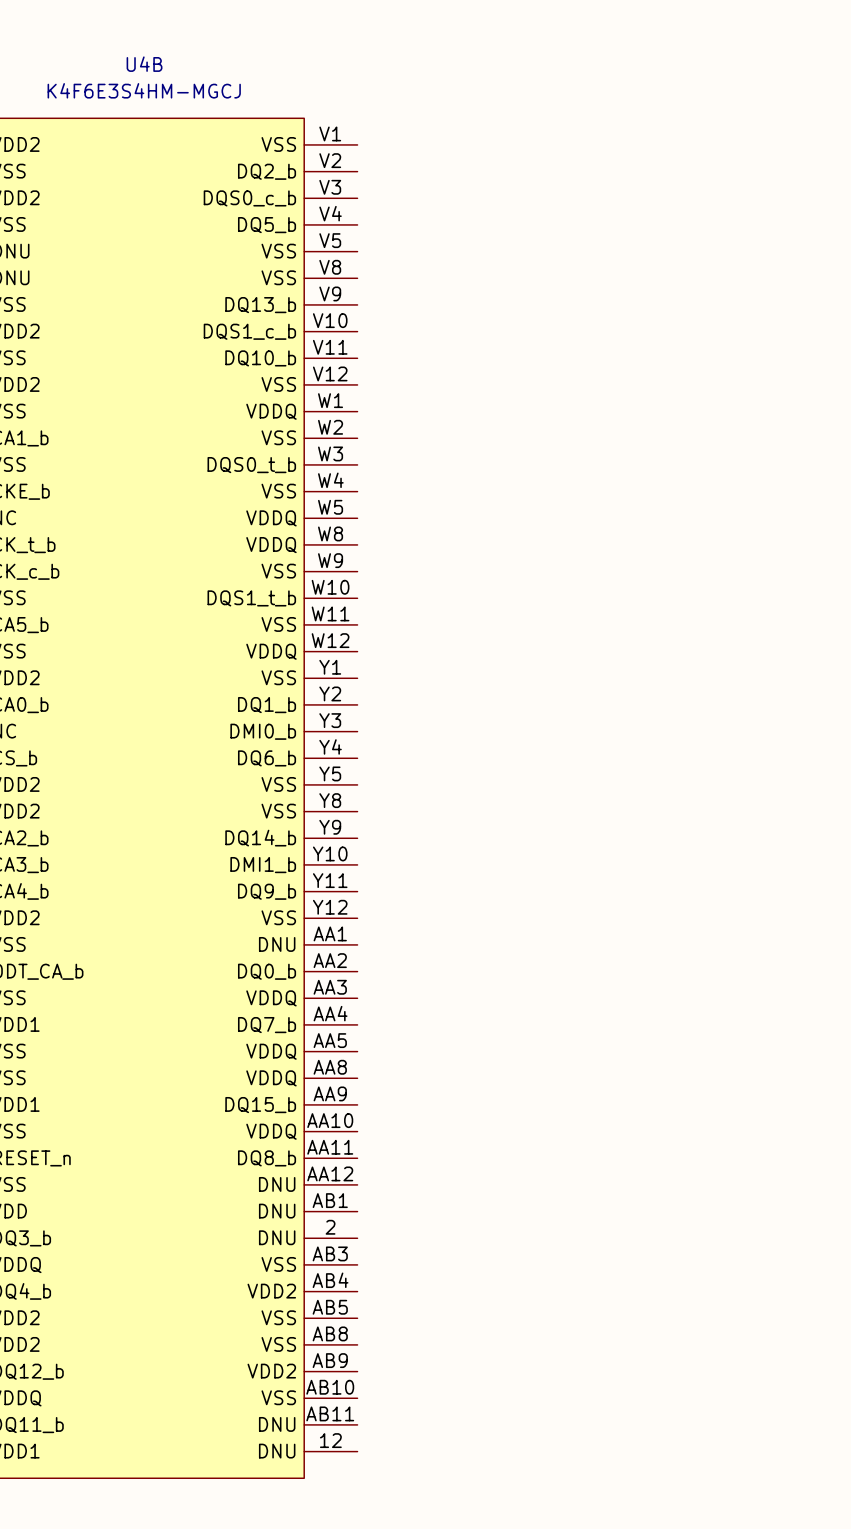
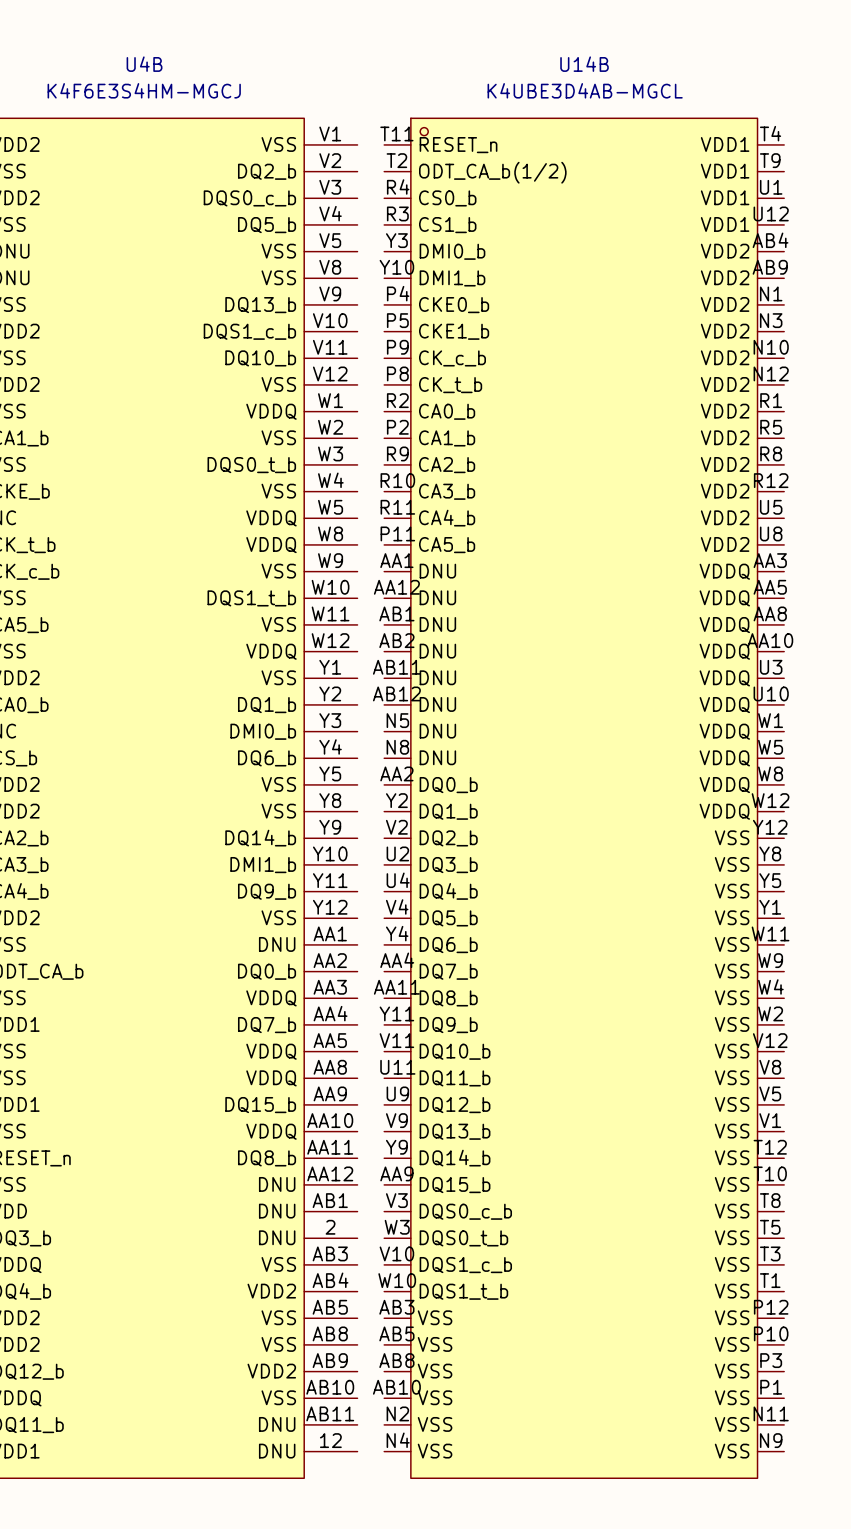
U14B: none -> K4UBE3D4AB-MGCL (584, 798)

